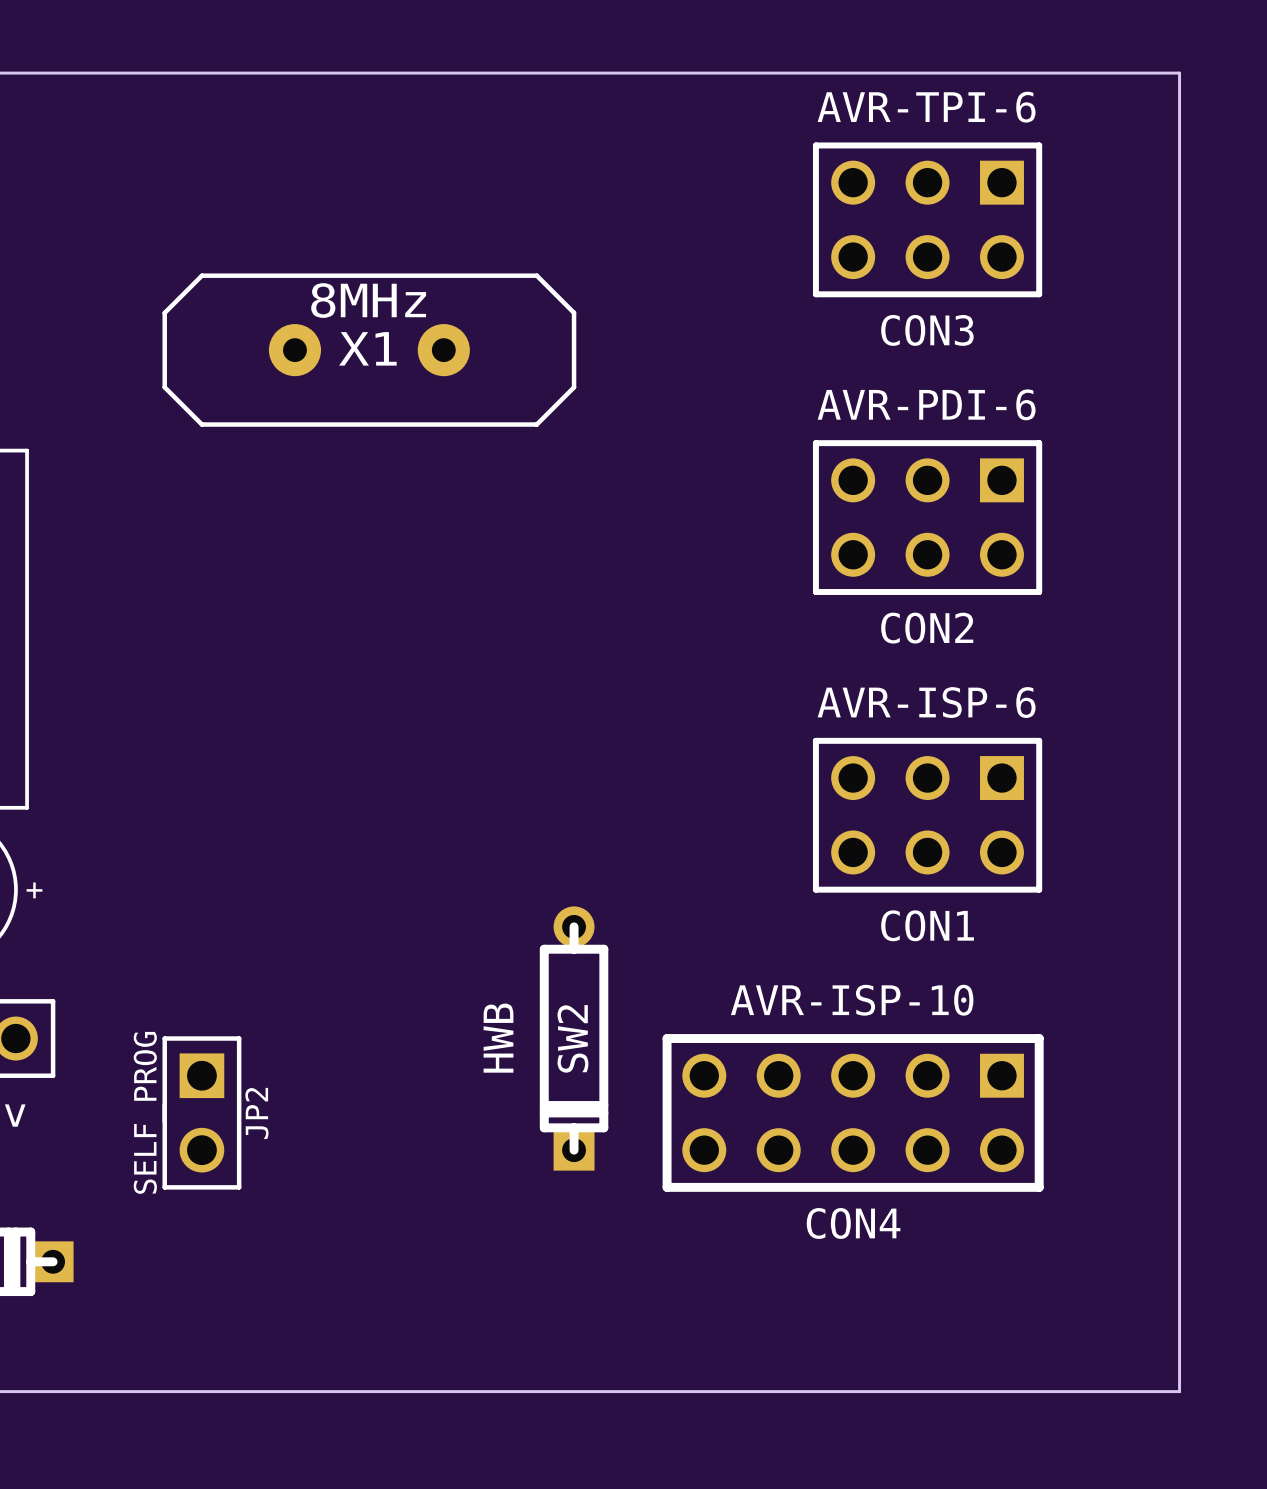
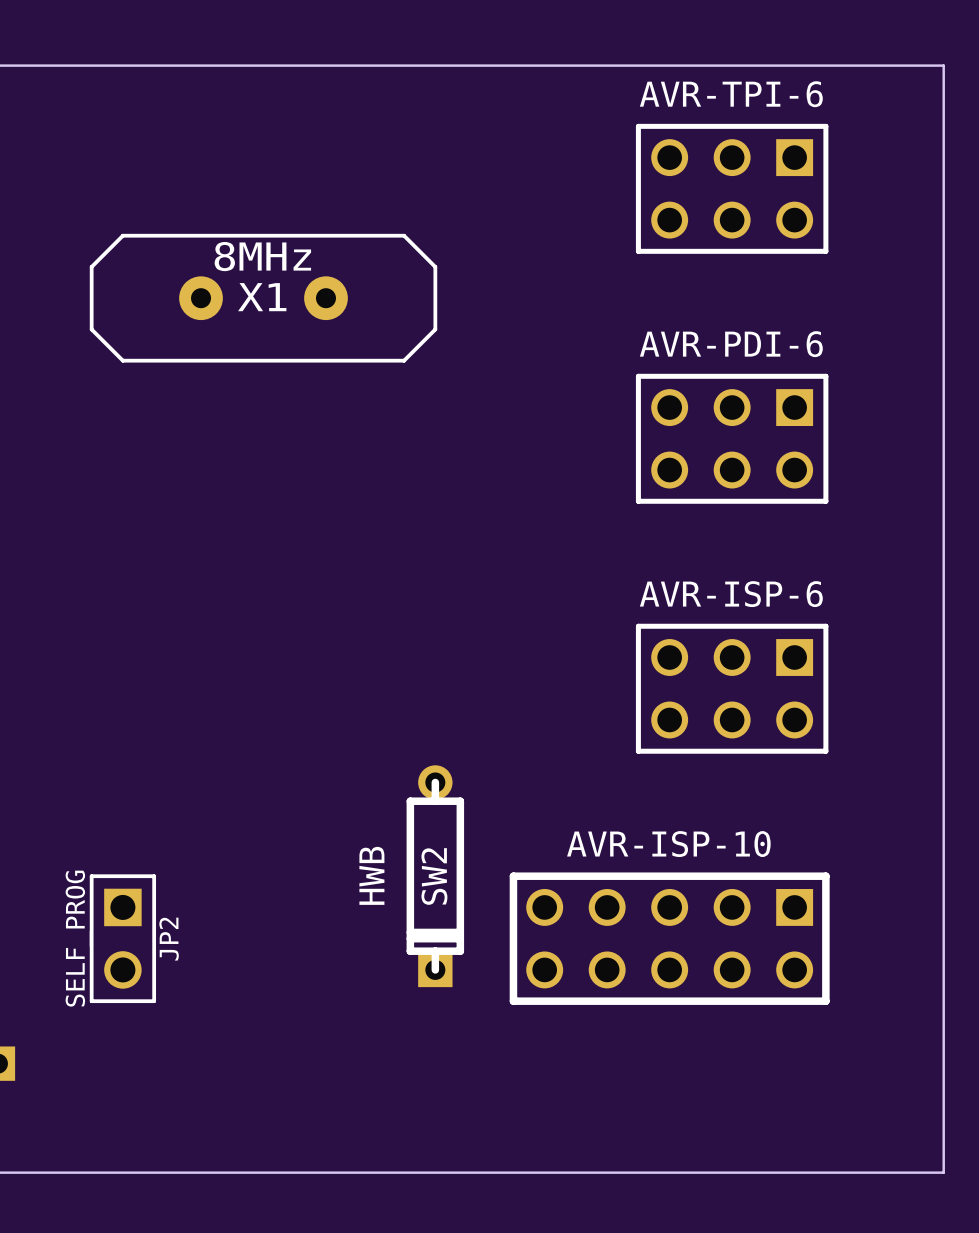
CON3 name: CON3 (927, 330) -> none
CON2 name: CON2 (927, 628) -> none
CON1 name: CON1 (927, 925) -> none
CON4 name: CON4 (853, 1223) -> none

